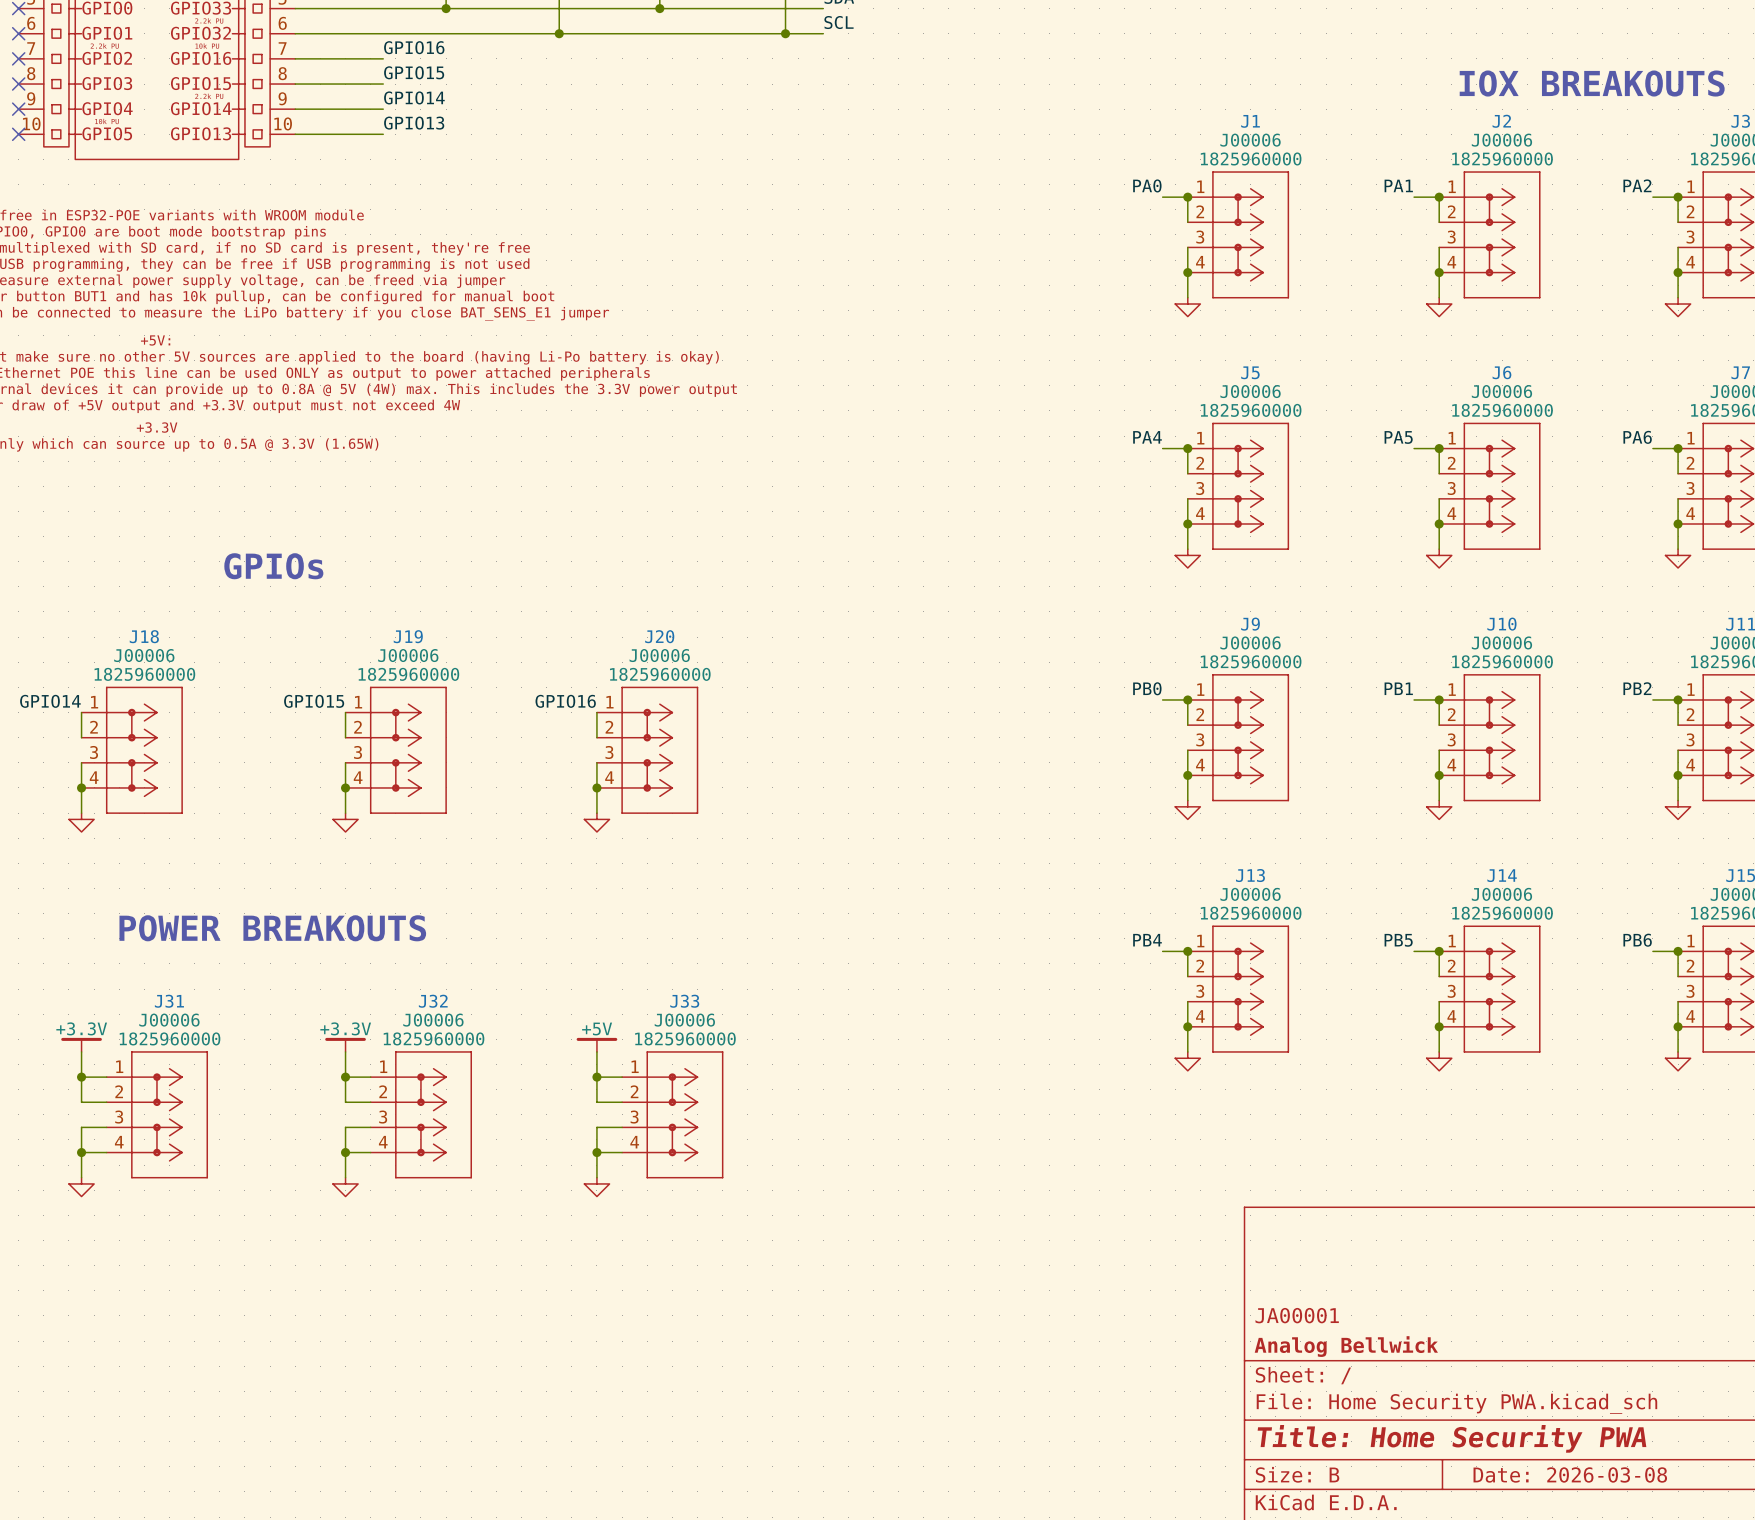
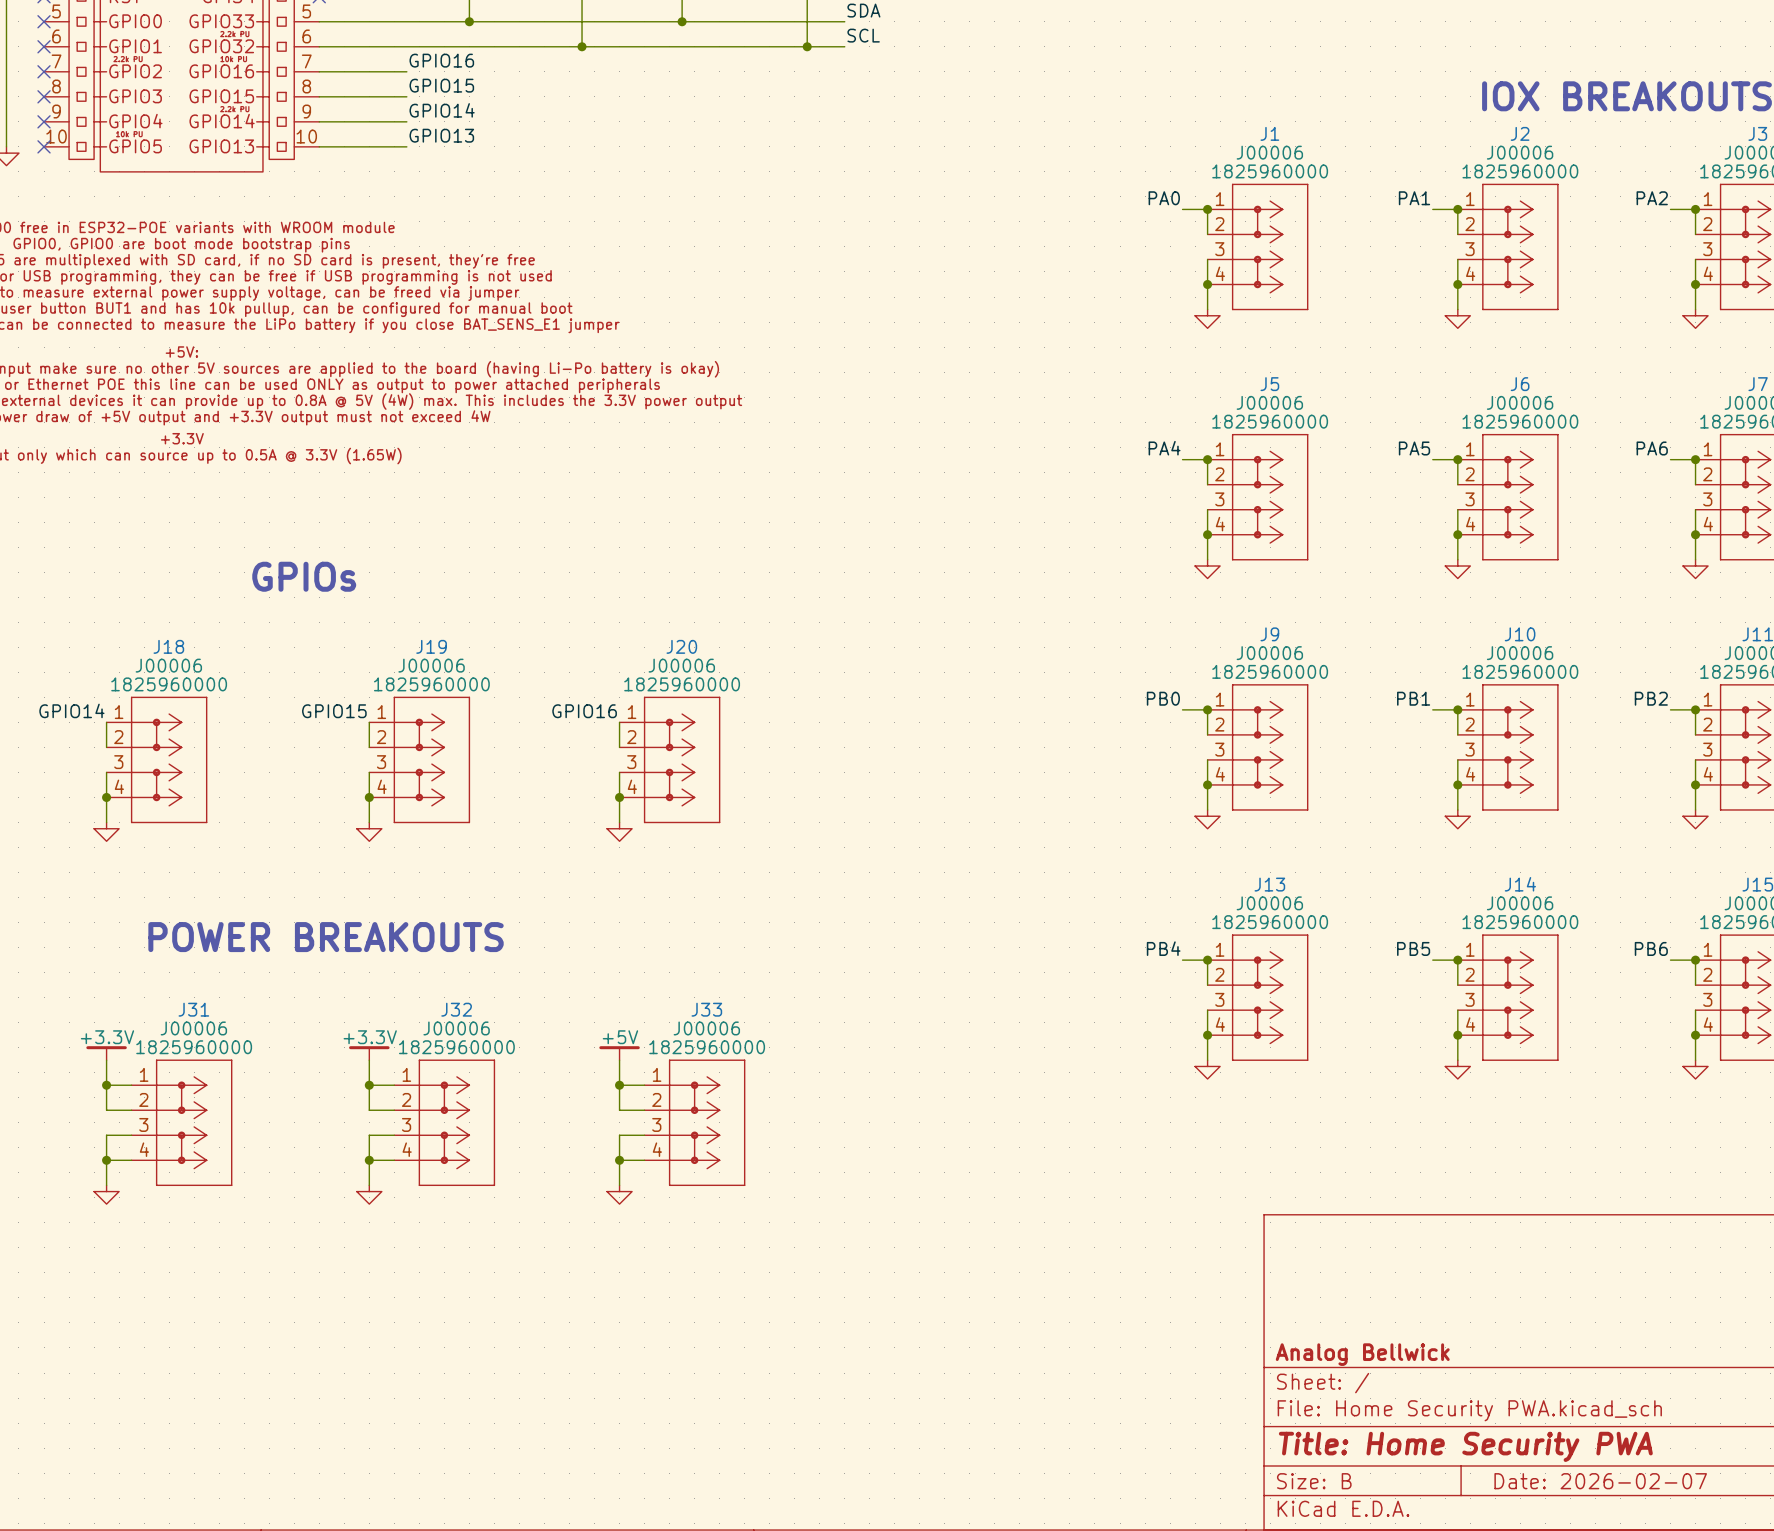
title block: JA00001 (1297, 1315) -> none
title block: Date: 2026-03-08 (1570, 1474) -> Date: 2026-02-07 (1600, 1481)

